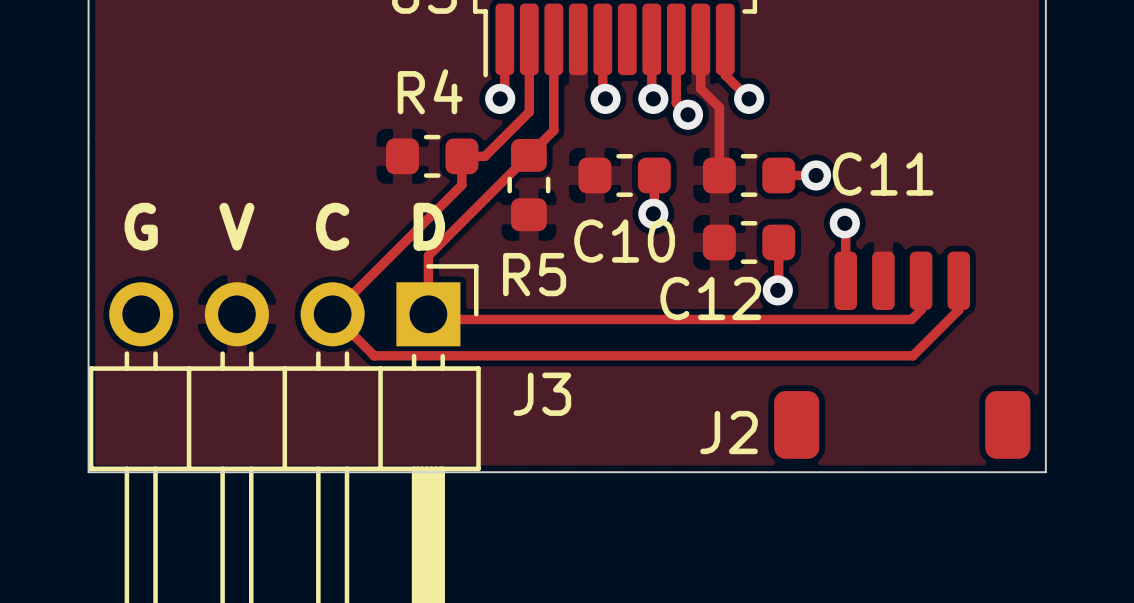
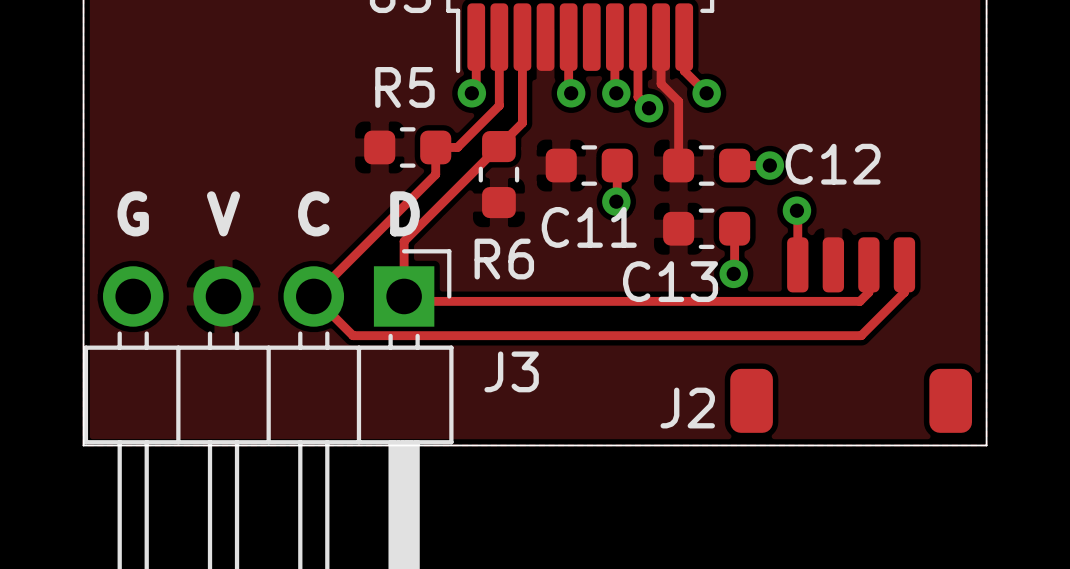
R4 name: R4 (430, 91) -> R5 (404, 87)
C11 name: C11 (883, 174) -> C12 (833, 164)
C10 name: C10 (624, 241) -> C11 (589, 227)
R5 name: R5 (534, 274) -> R6 (504, 259)
C12 name: C12 (710, 298) -> C13 (670, 281)

